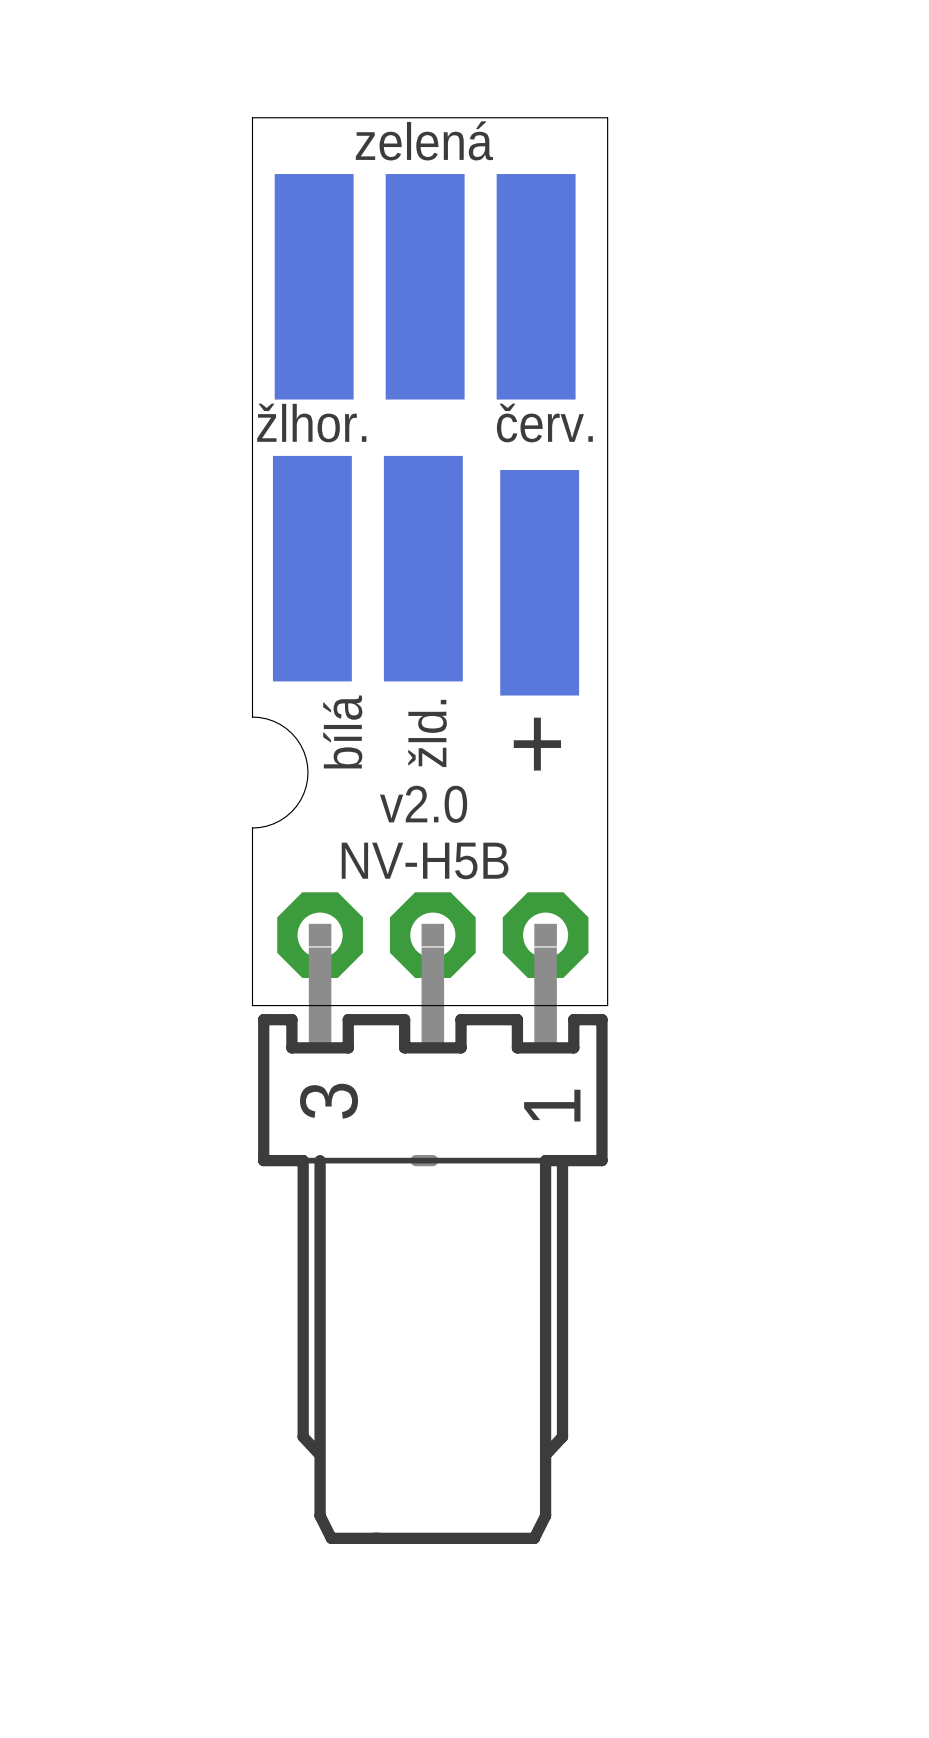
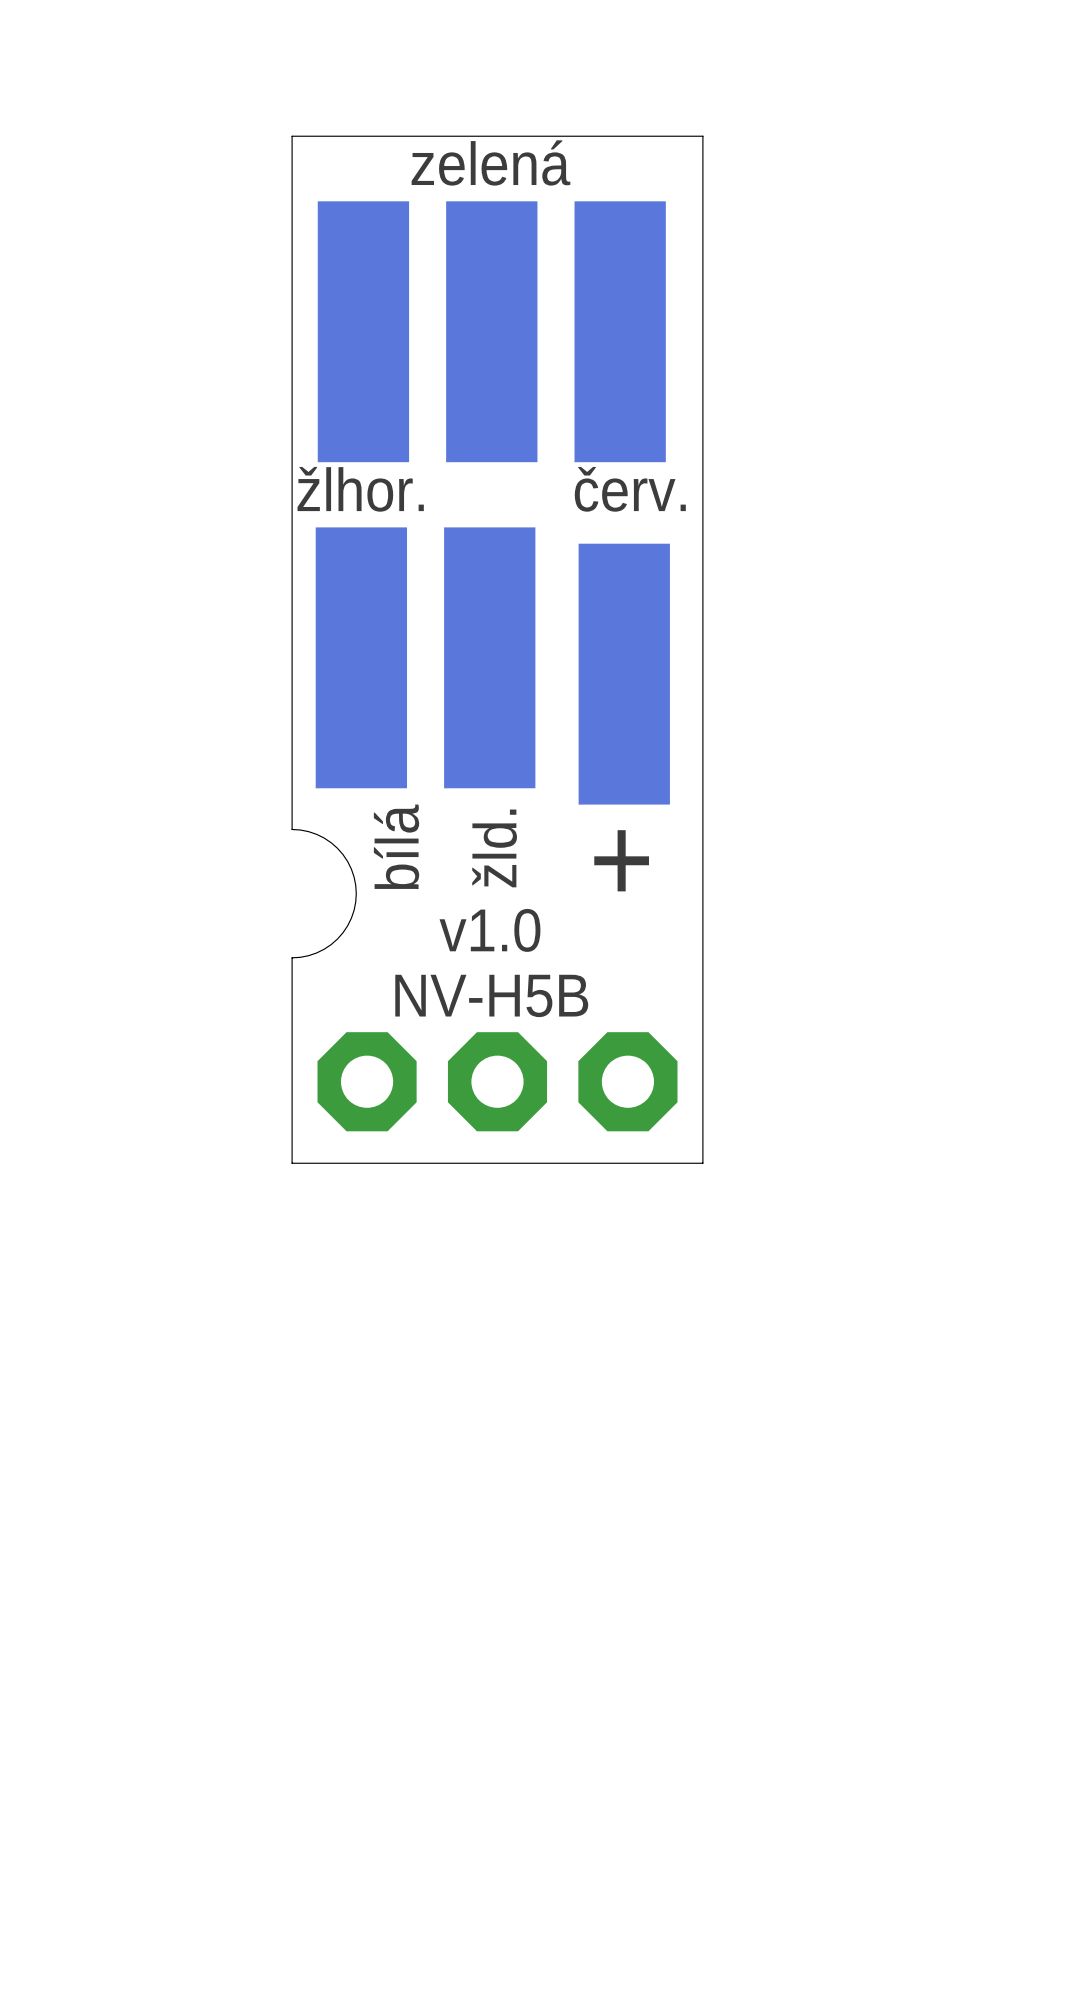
text: v2.0 (423, 804) -> v1.0 (489, 930)
part side: bottom (432, 1218) -> top (497, 1081)

